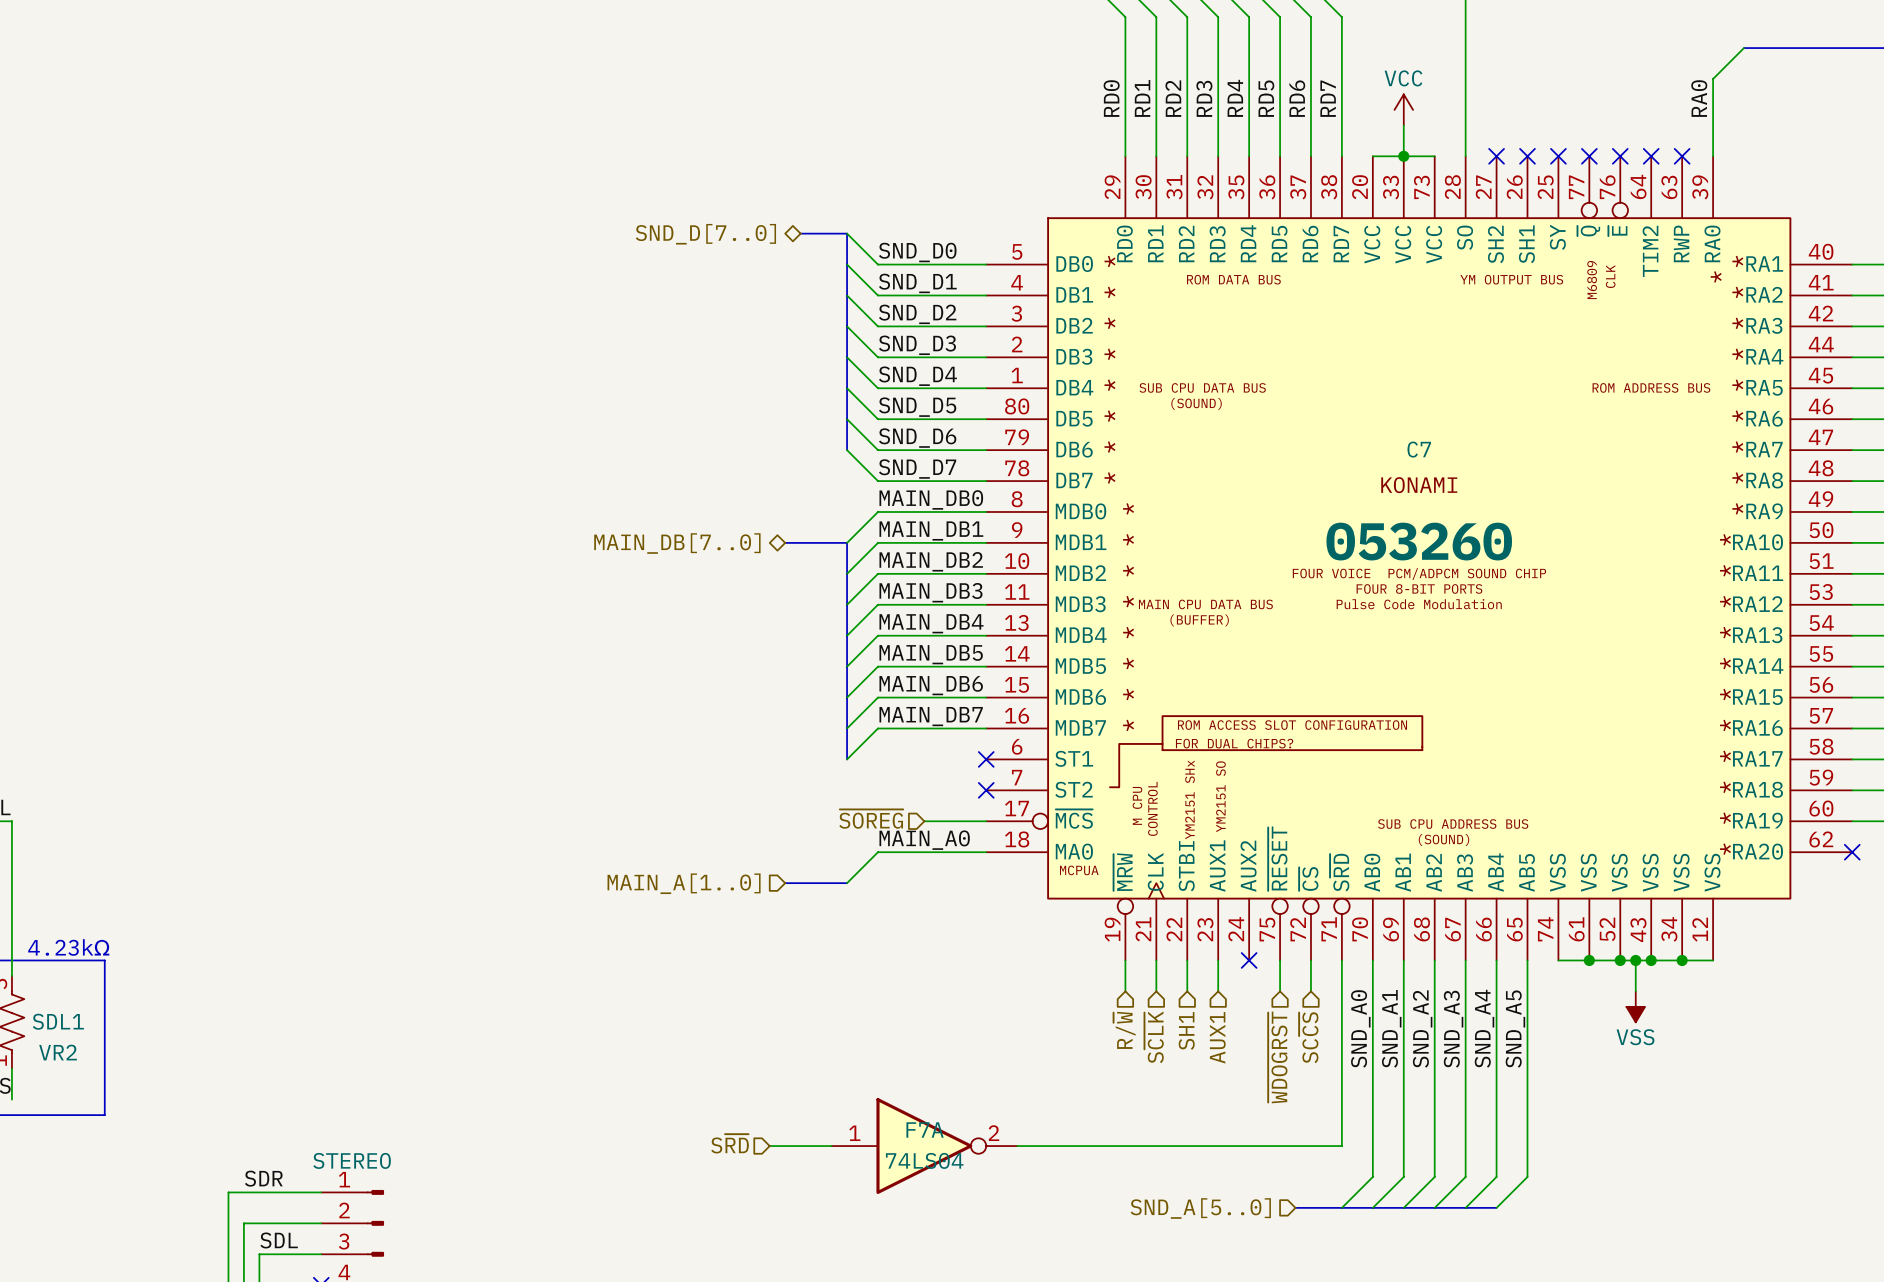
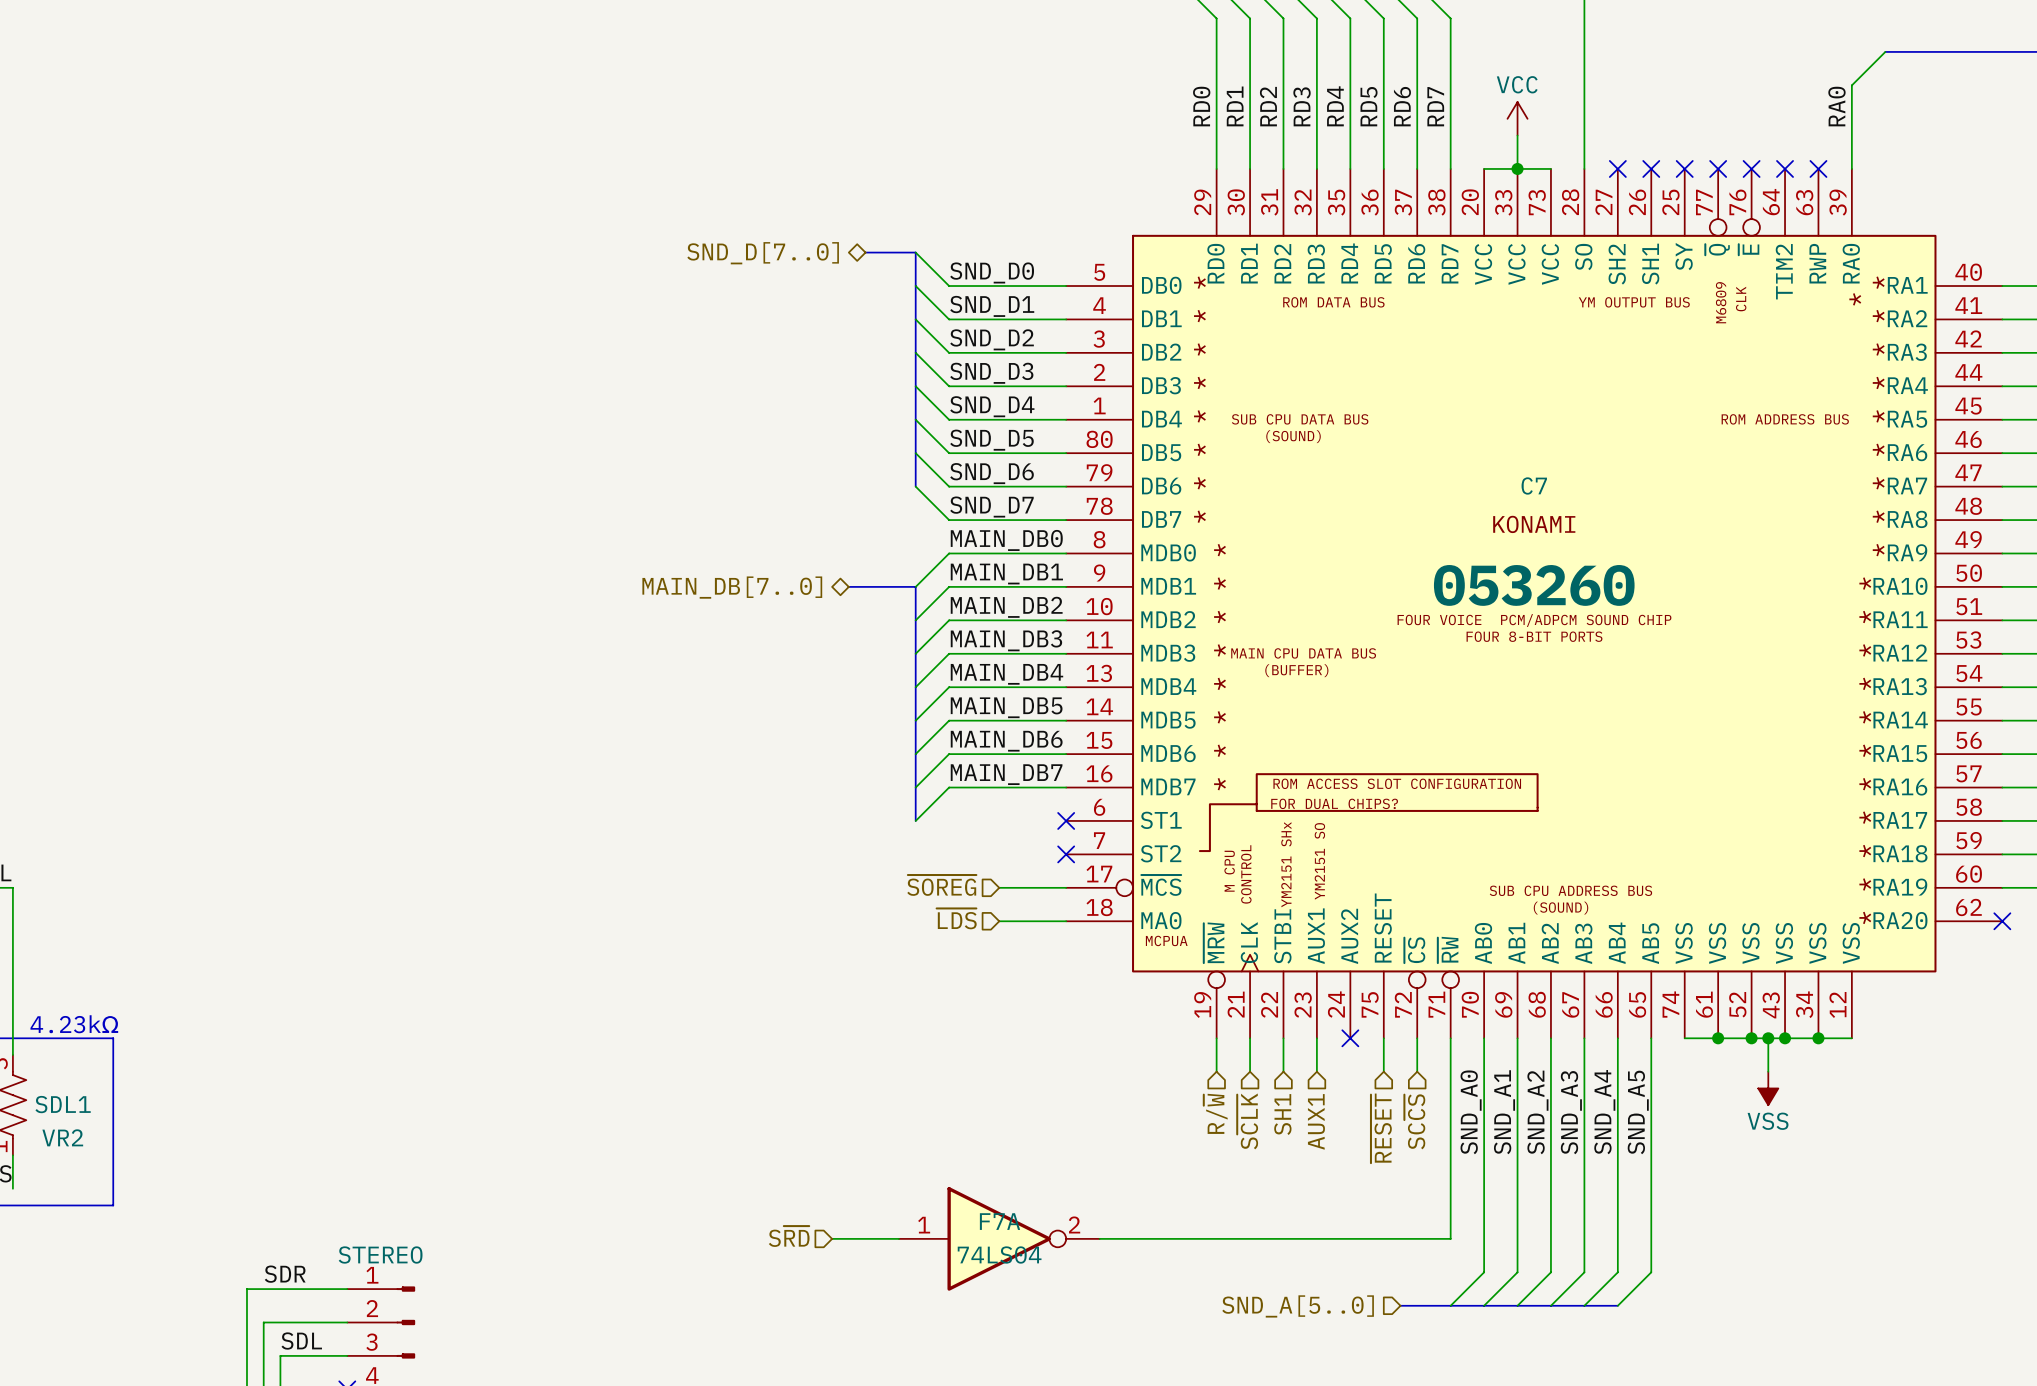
C7 symbol: [986, 156, 1853, 961] -> [1066, 168, 2003, 1039]
label: MAIN_A0 (924, 840) -> none
hierarchical label: none -> ~{LDS} (956, 918)
wire: (924, 852) (877, 852) (847, 883) -> none
hierarchical label: MAIN_A[1..0] (684, 883) -> none
bus: (785, 883) (847, 883) -> none
hierarchical label: ~{WDOGRST} (1277, 1057) -> ~{RESET} (1381, 1128)

